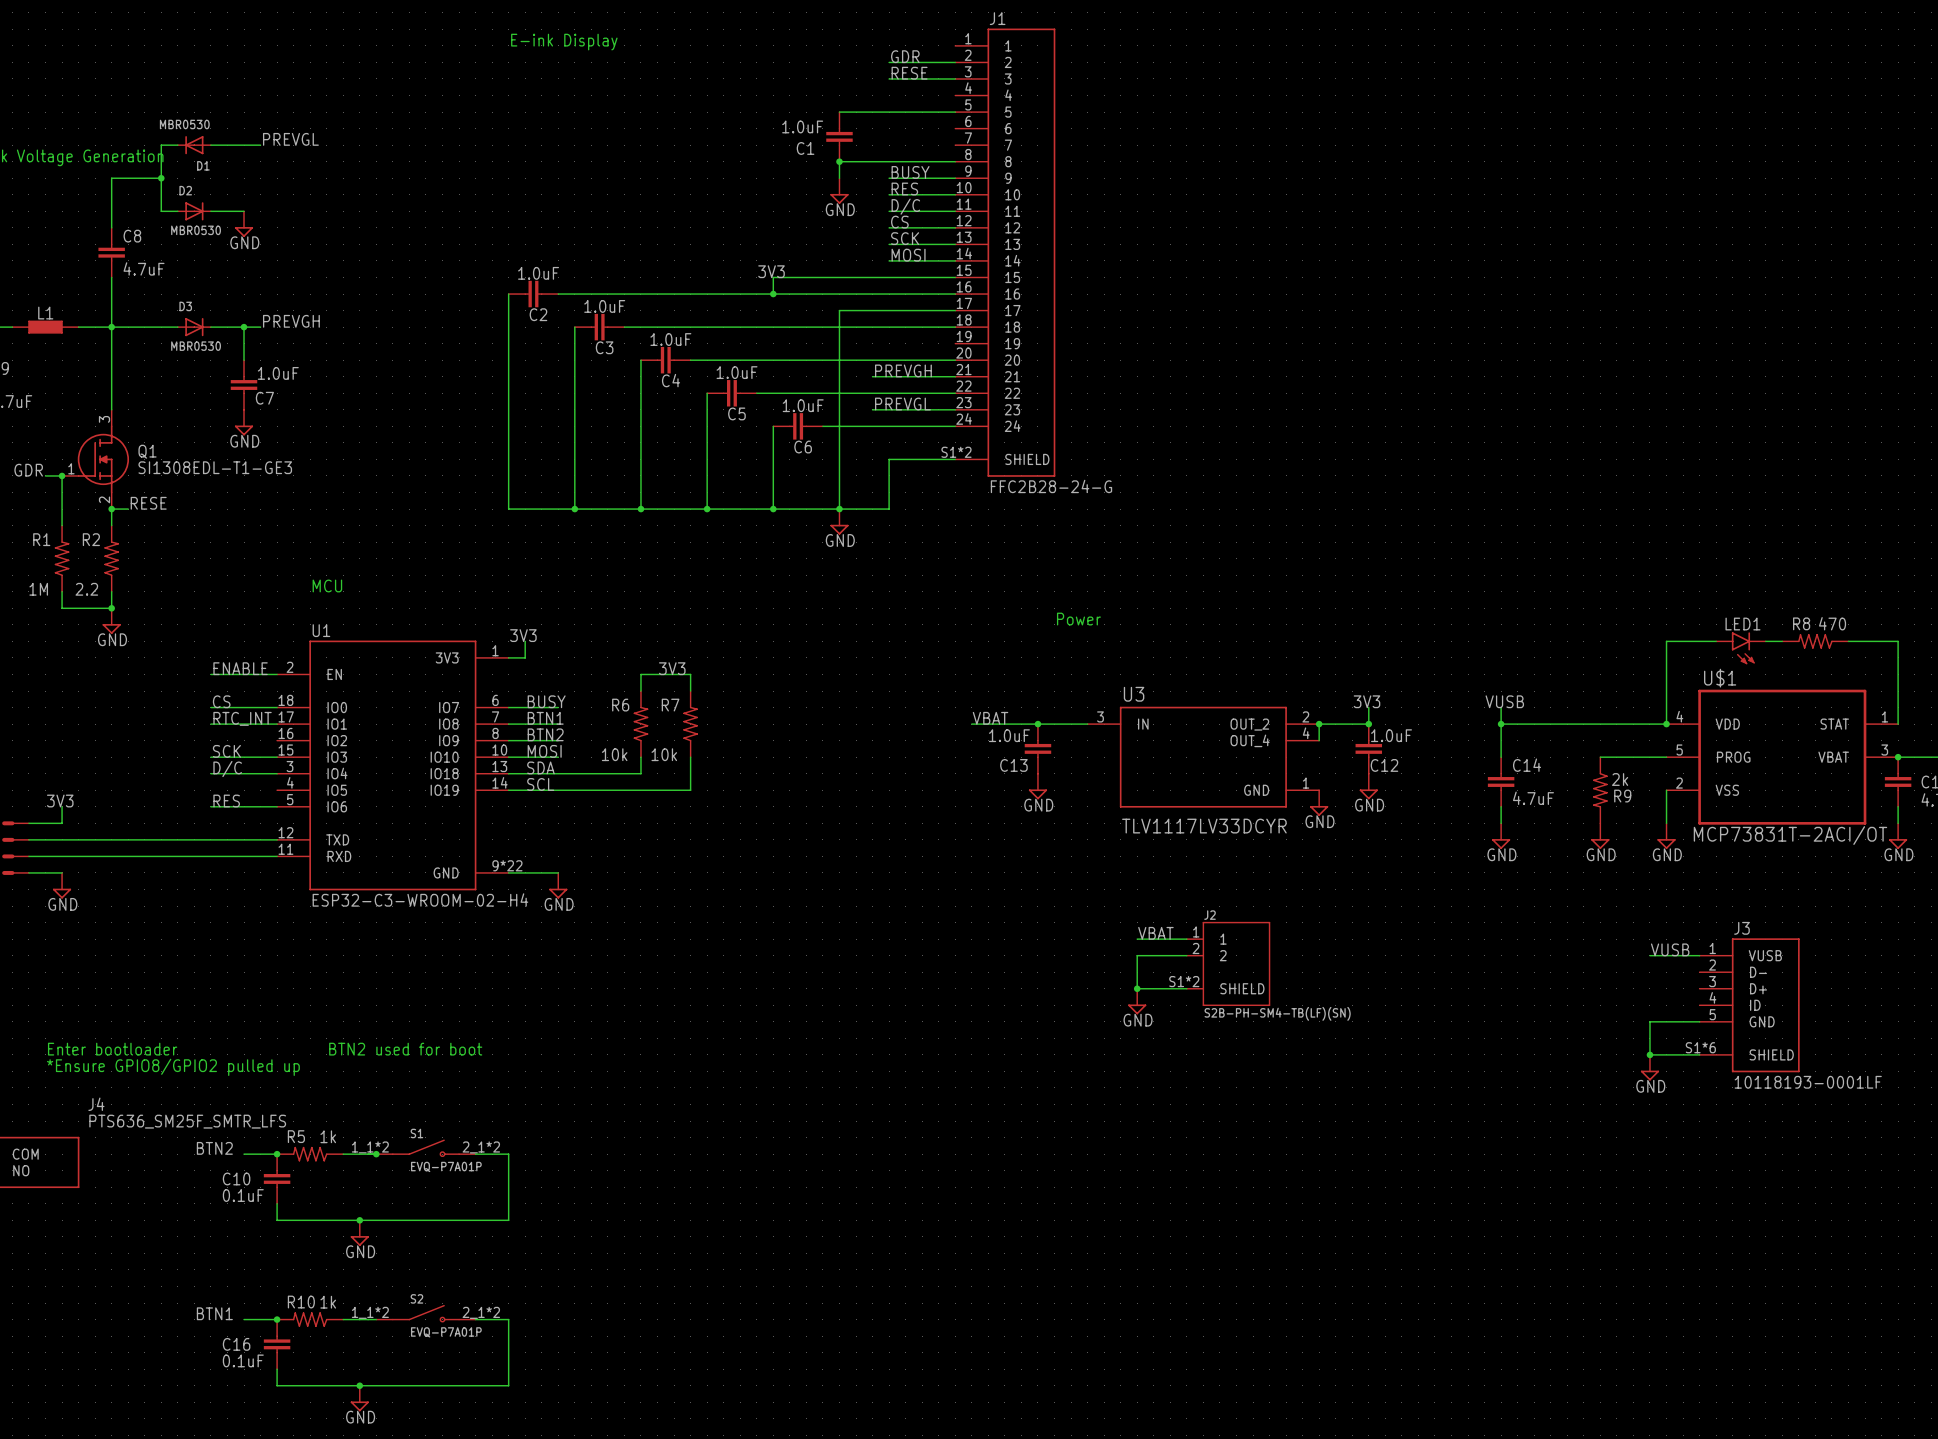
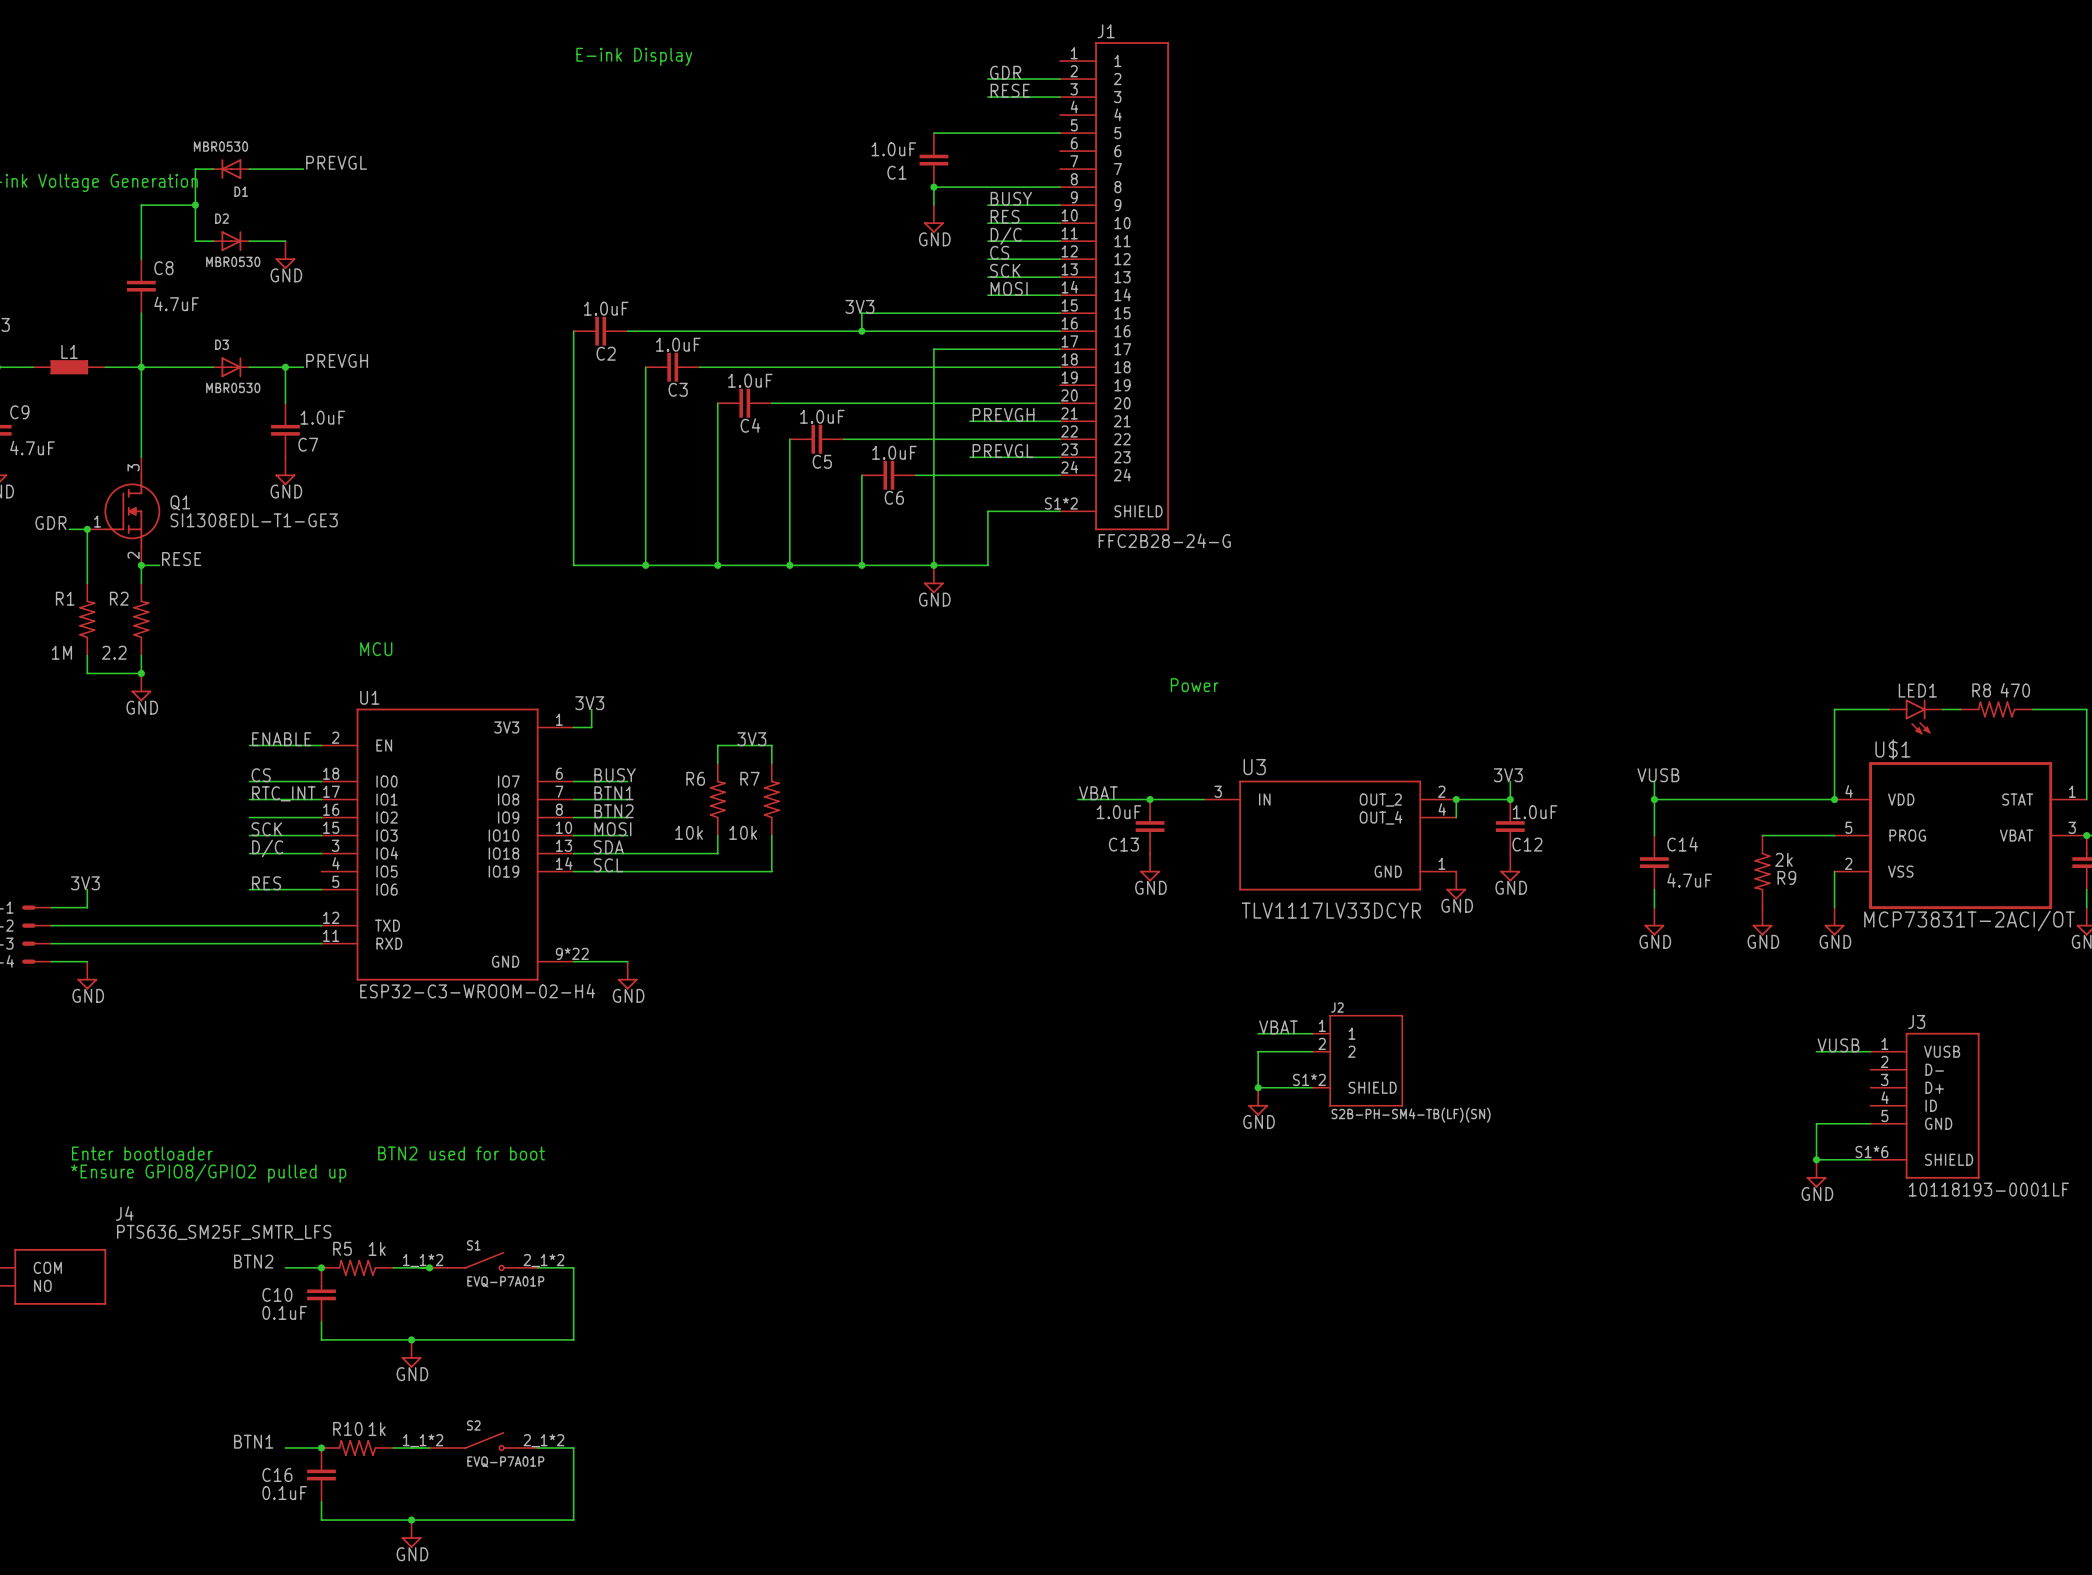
wire: none -> (249, 817) (321, 817)

